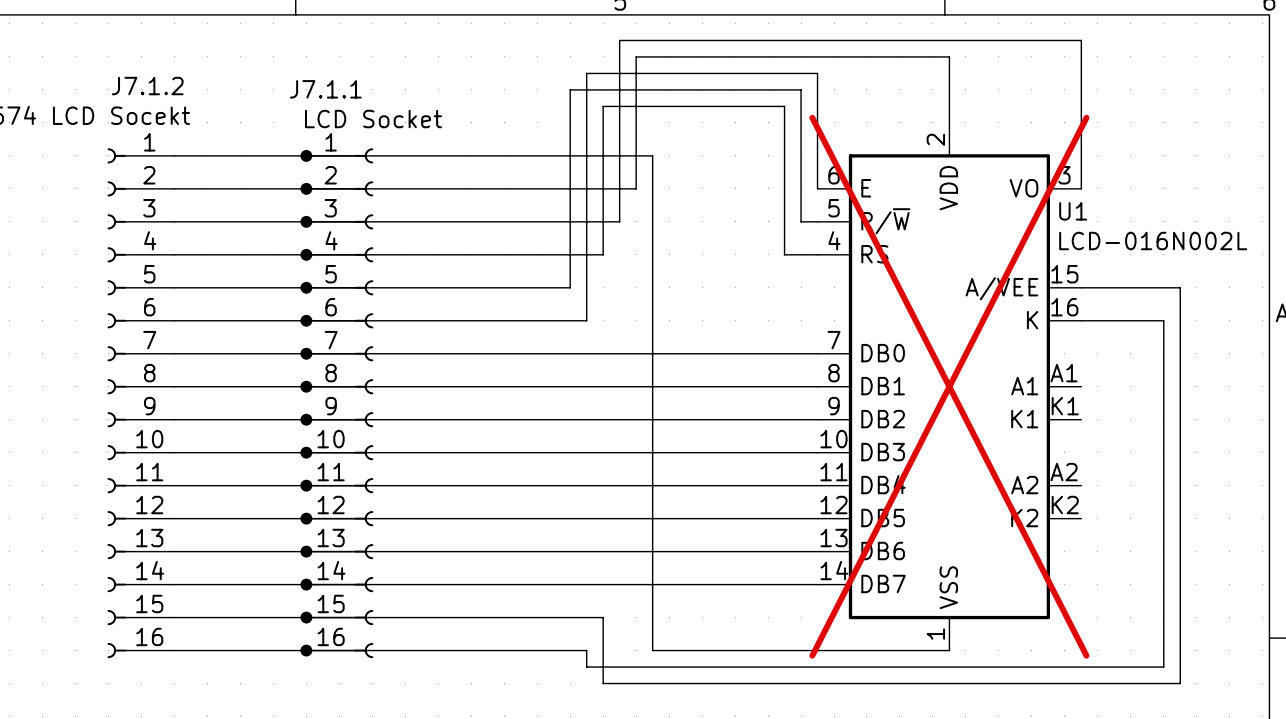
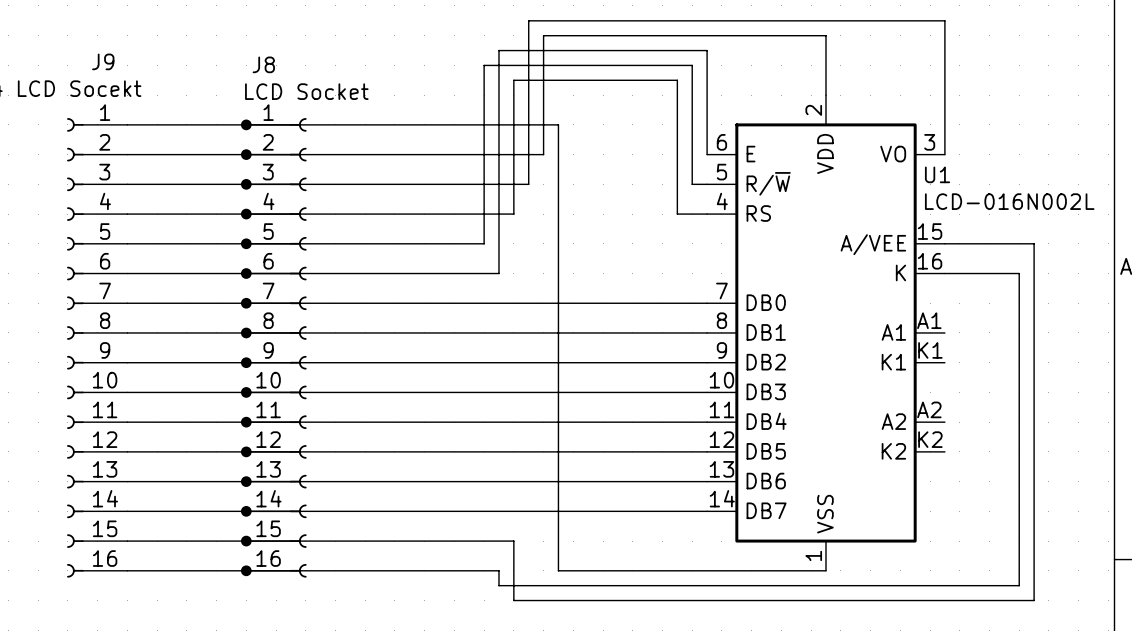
J7.1.2 name: J7.1.2 (147, 86) -> J9 (103, 61)
J7.1.1 name: J7.1.1 (325, 89) -> J8 (263, 64)
U1 do-not-place cross: (949, 386) -> none

